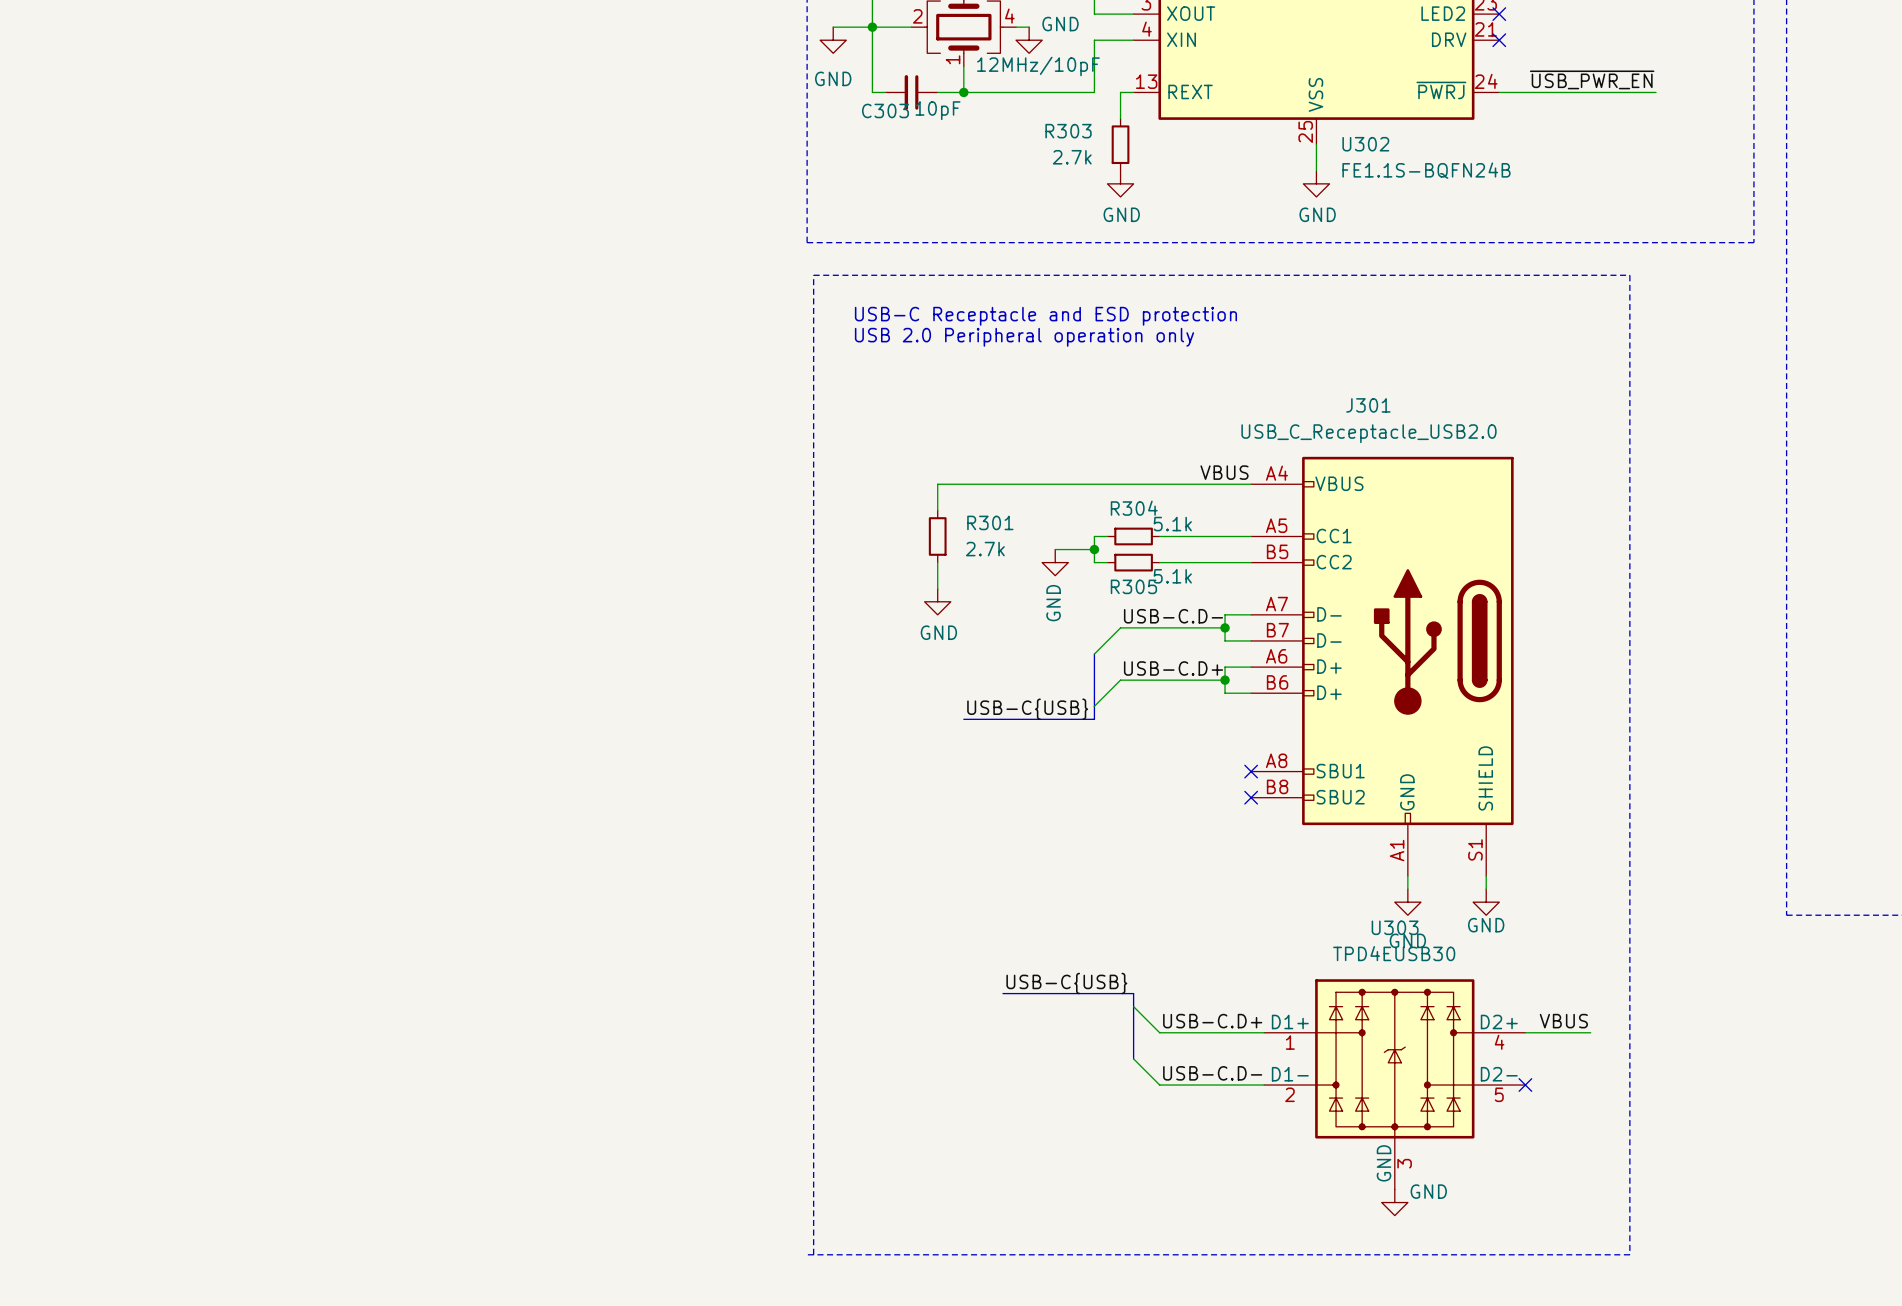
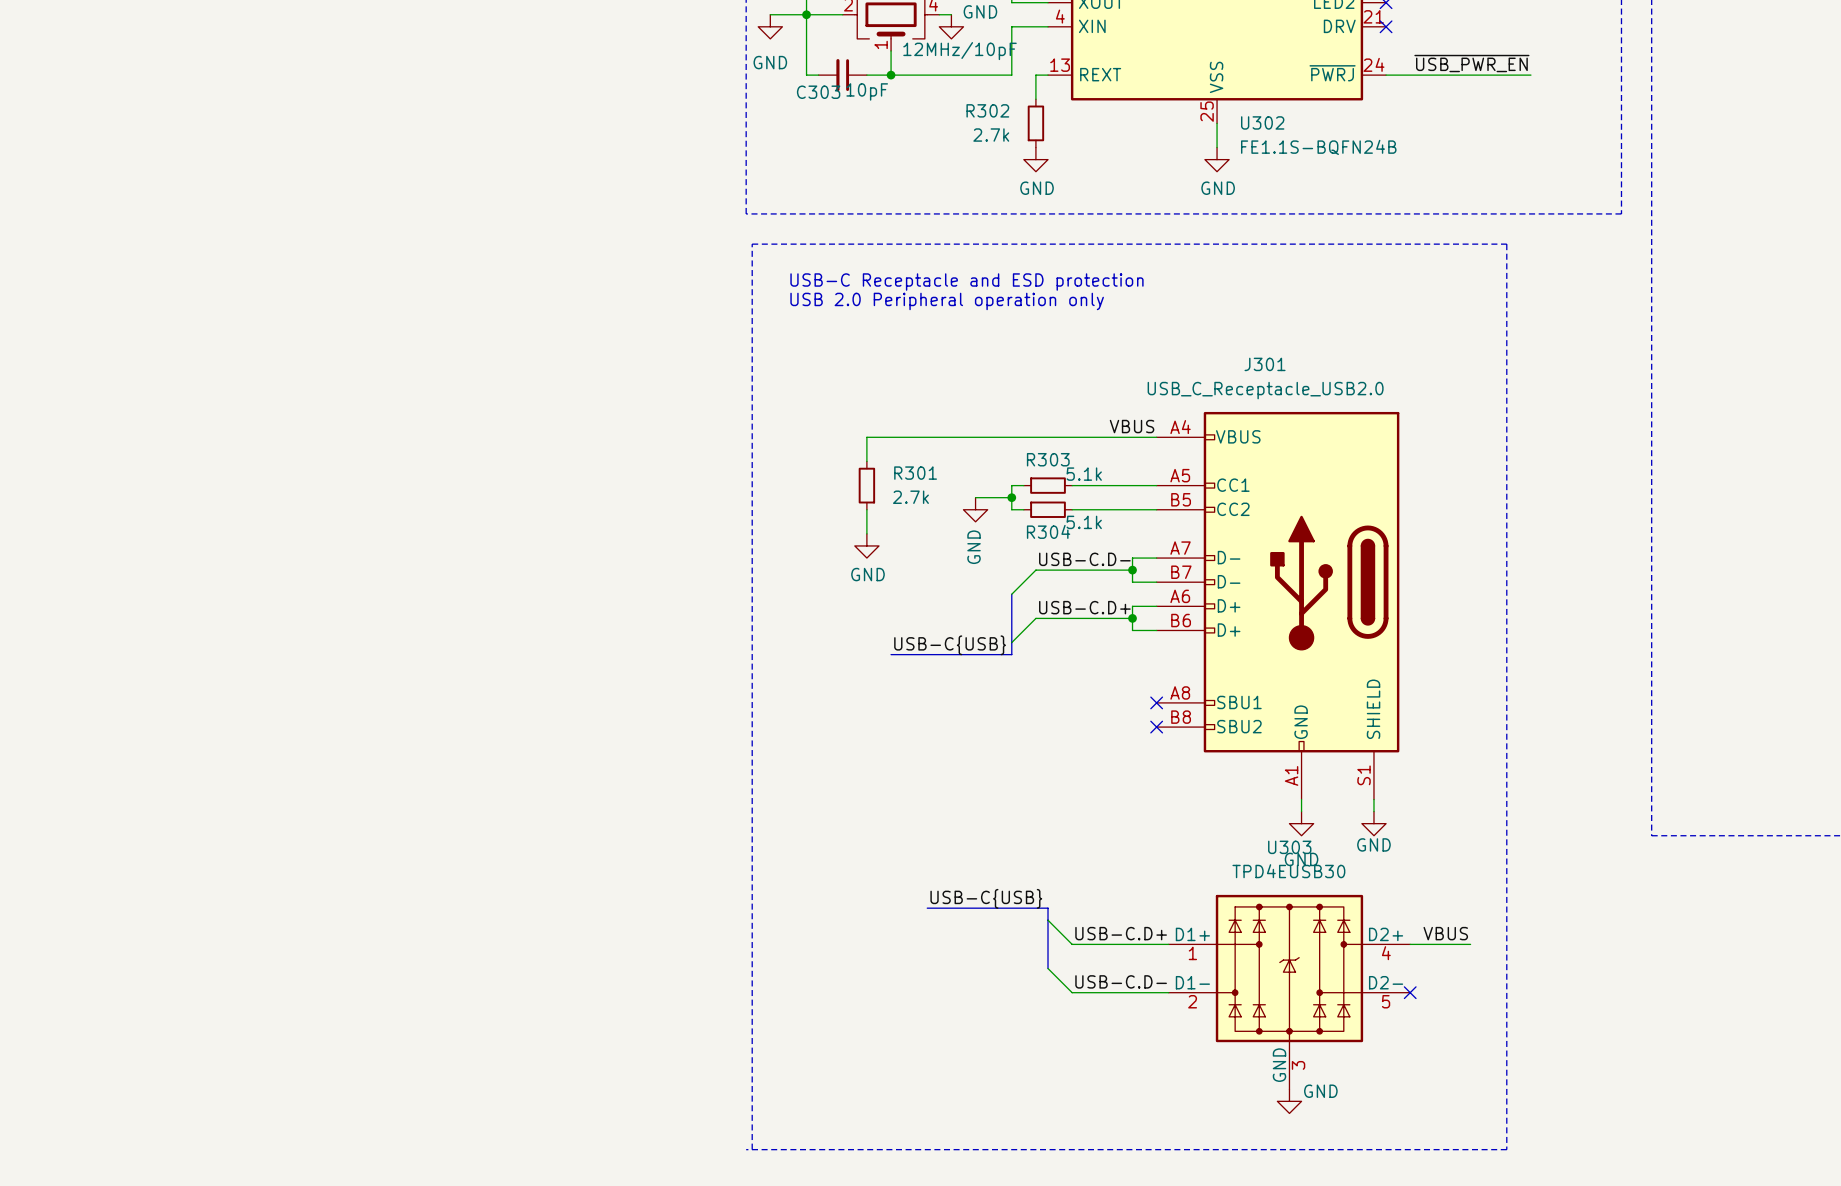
R303 name: R303 (1068, 131) -> R302 (987, 110)
R304 name: R304 (1134, 508) -> R303 (1048, 459)
R305 name: R305 (1133, 586) -> R304 (1048, 531)

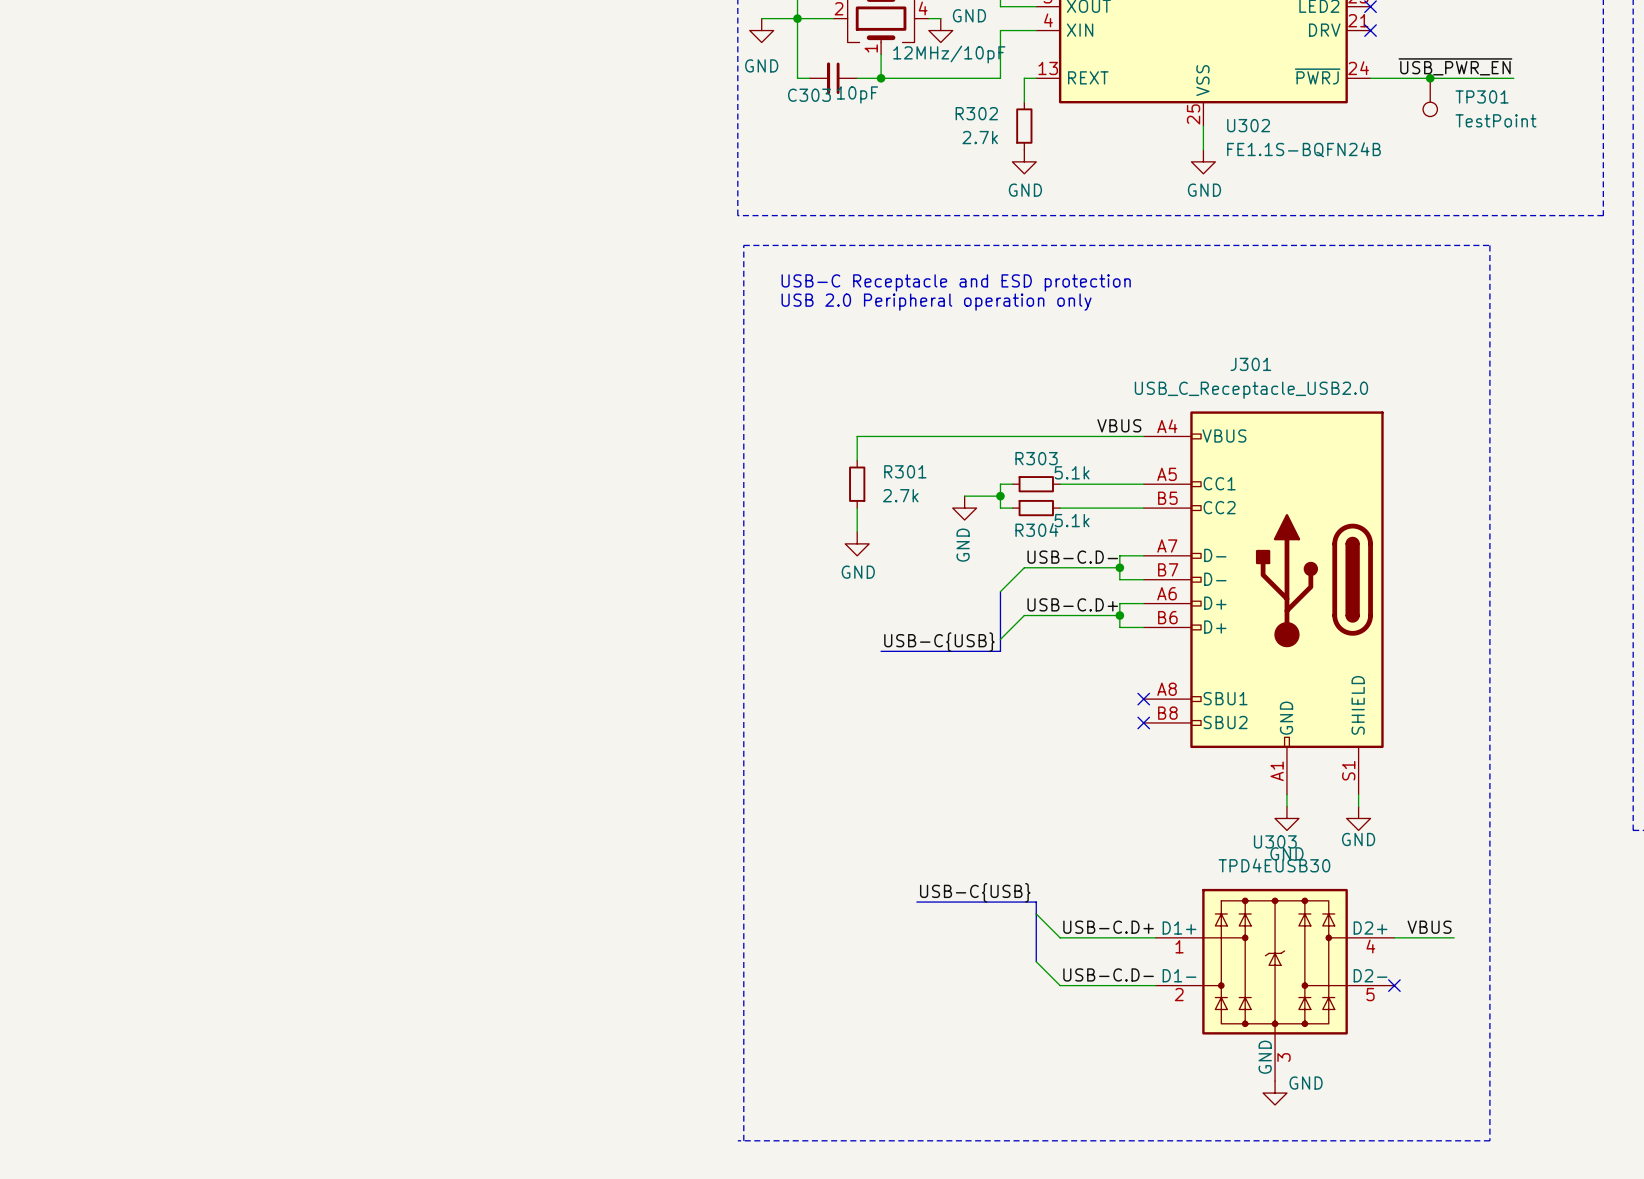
junction: none -> (1430, 78)
TP301: none -> TestPoint (1430, 97)

